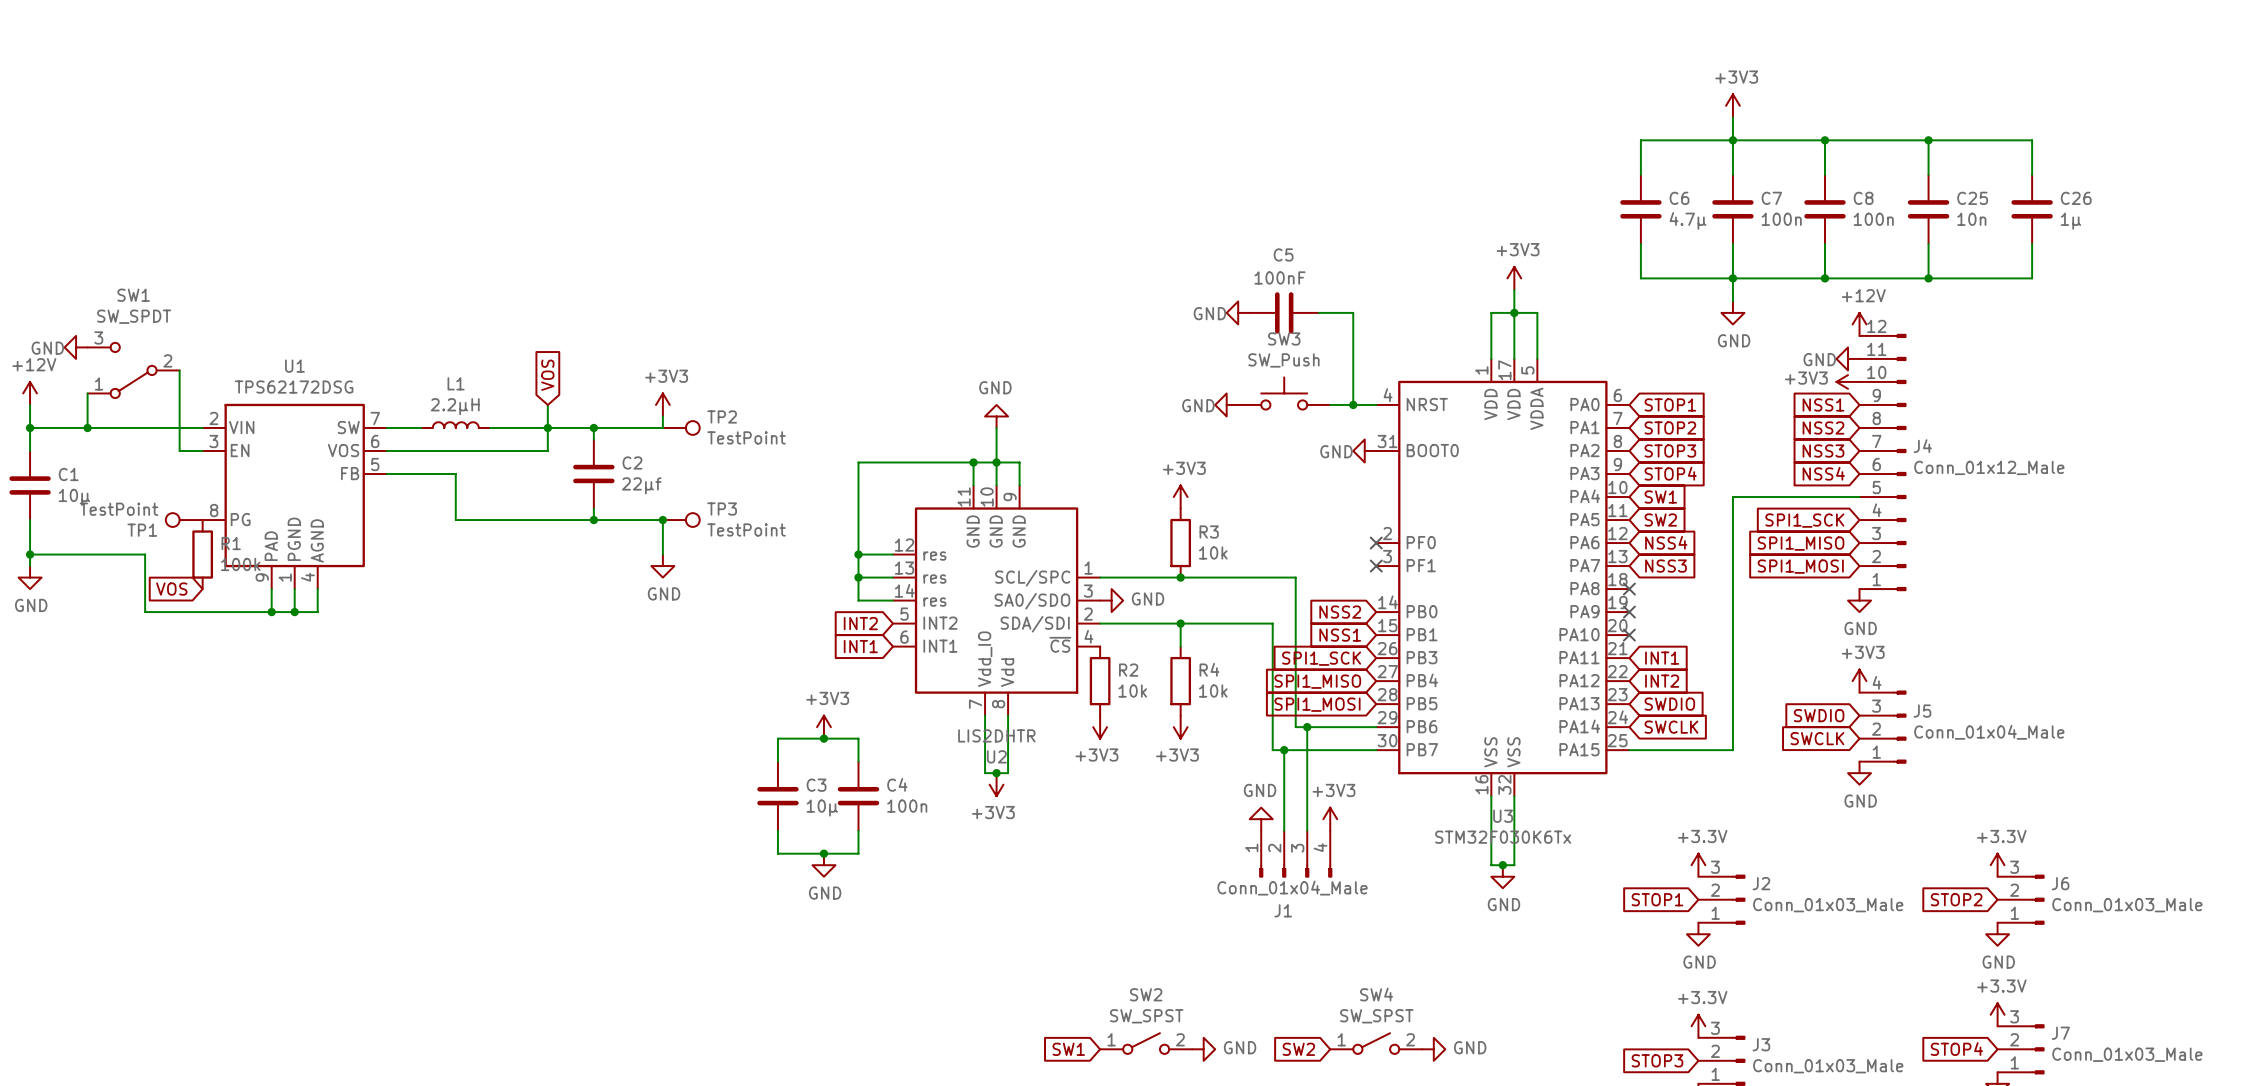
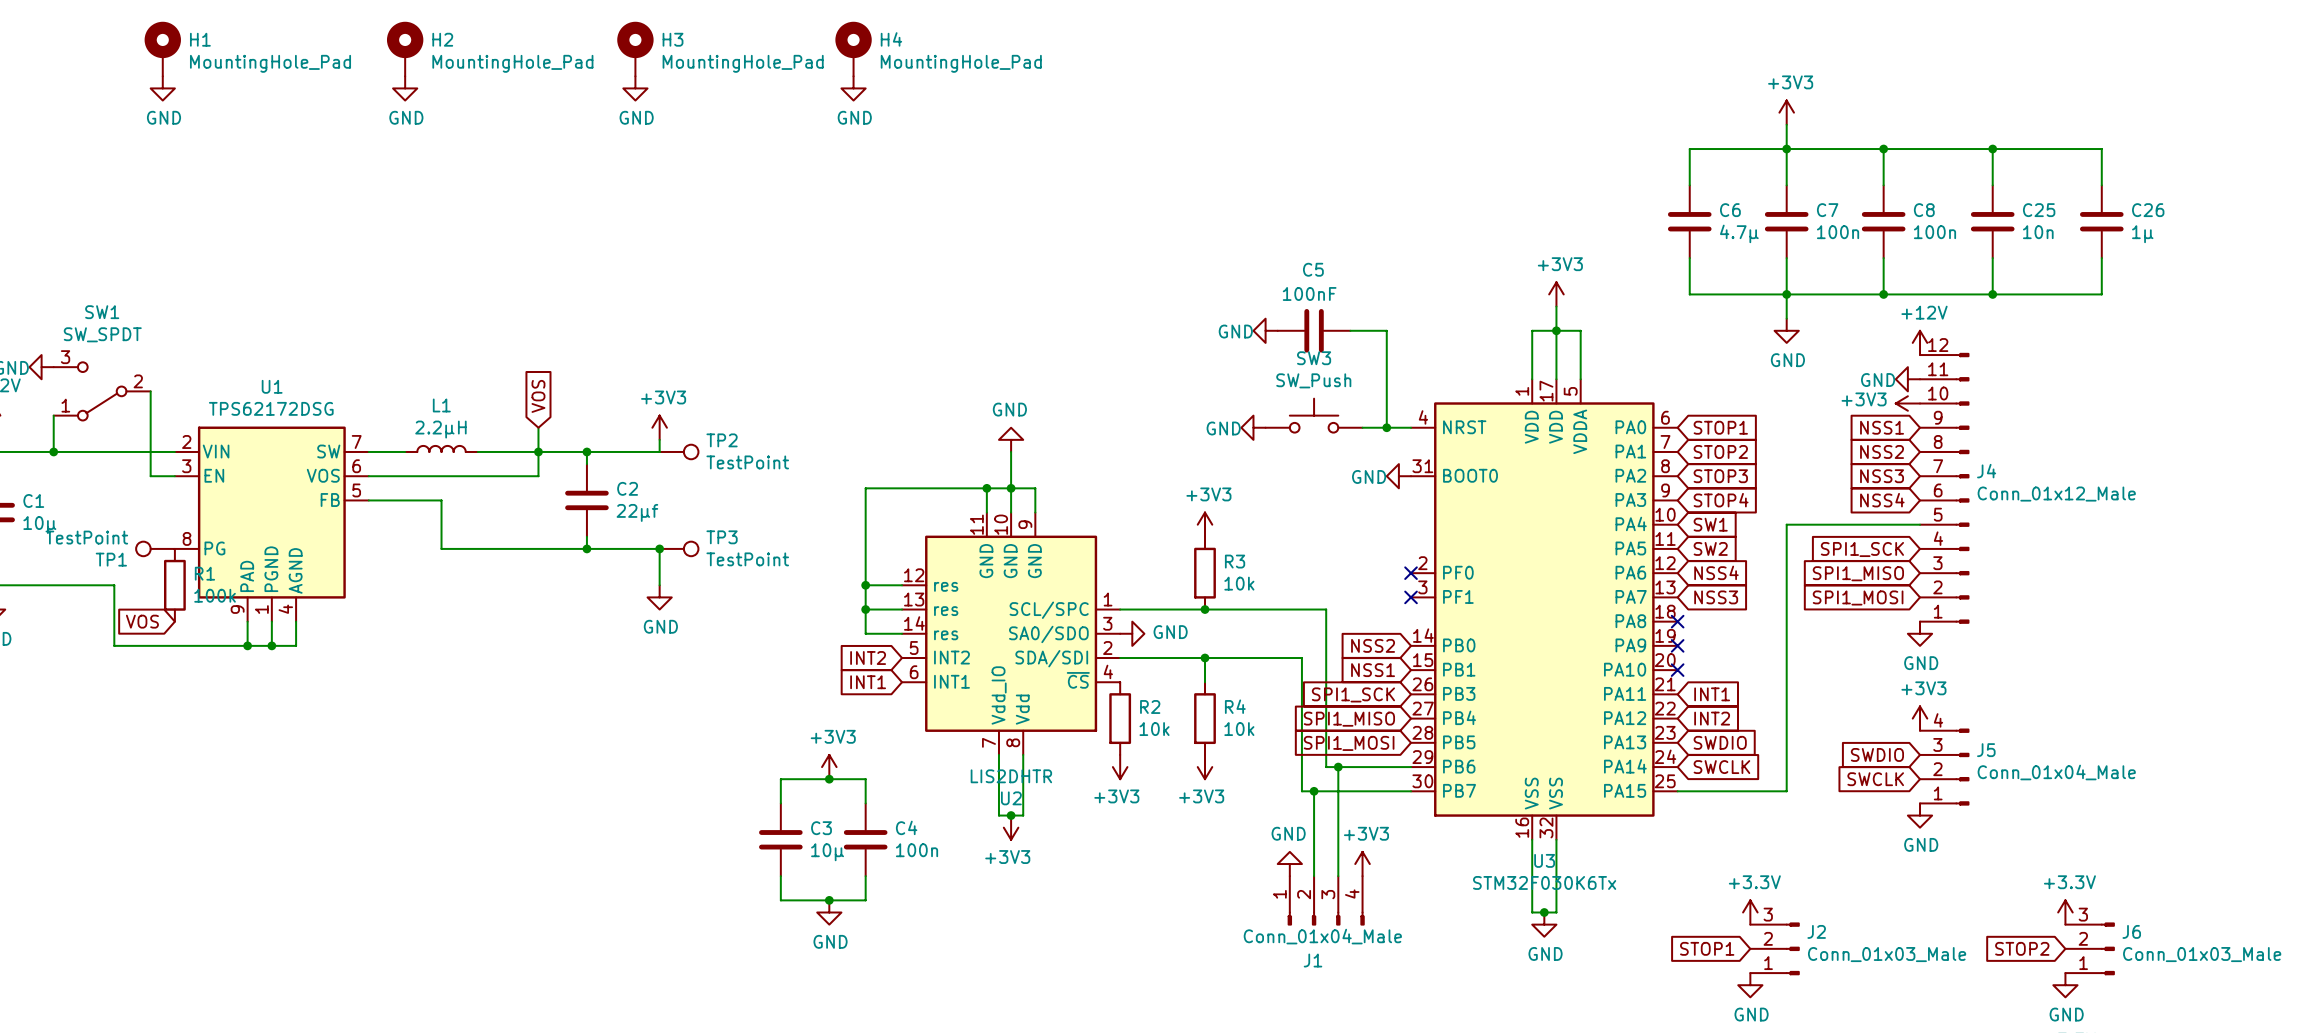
H1: none -> MountingHole_Pad (162, 49)
H2: none -> MountingHole_Pad (405, 49)
H3: none -> MountingHole_Pad (635, 49)
H4: none -> MountingHole_Pad (853, 49)
power symbol: none -> GND (162, 88)
power symbol: none -> GND (405, 88)
power symbol: none -> GND (635, 88)
power symbol: none -> GND (853, 88)

